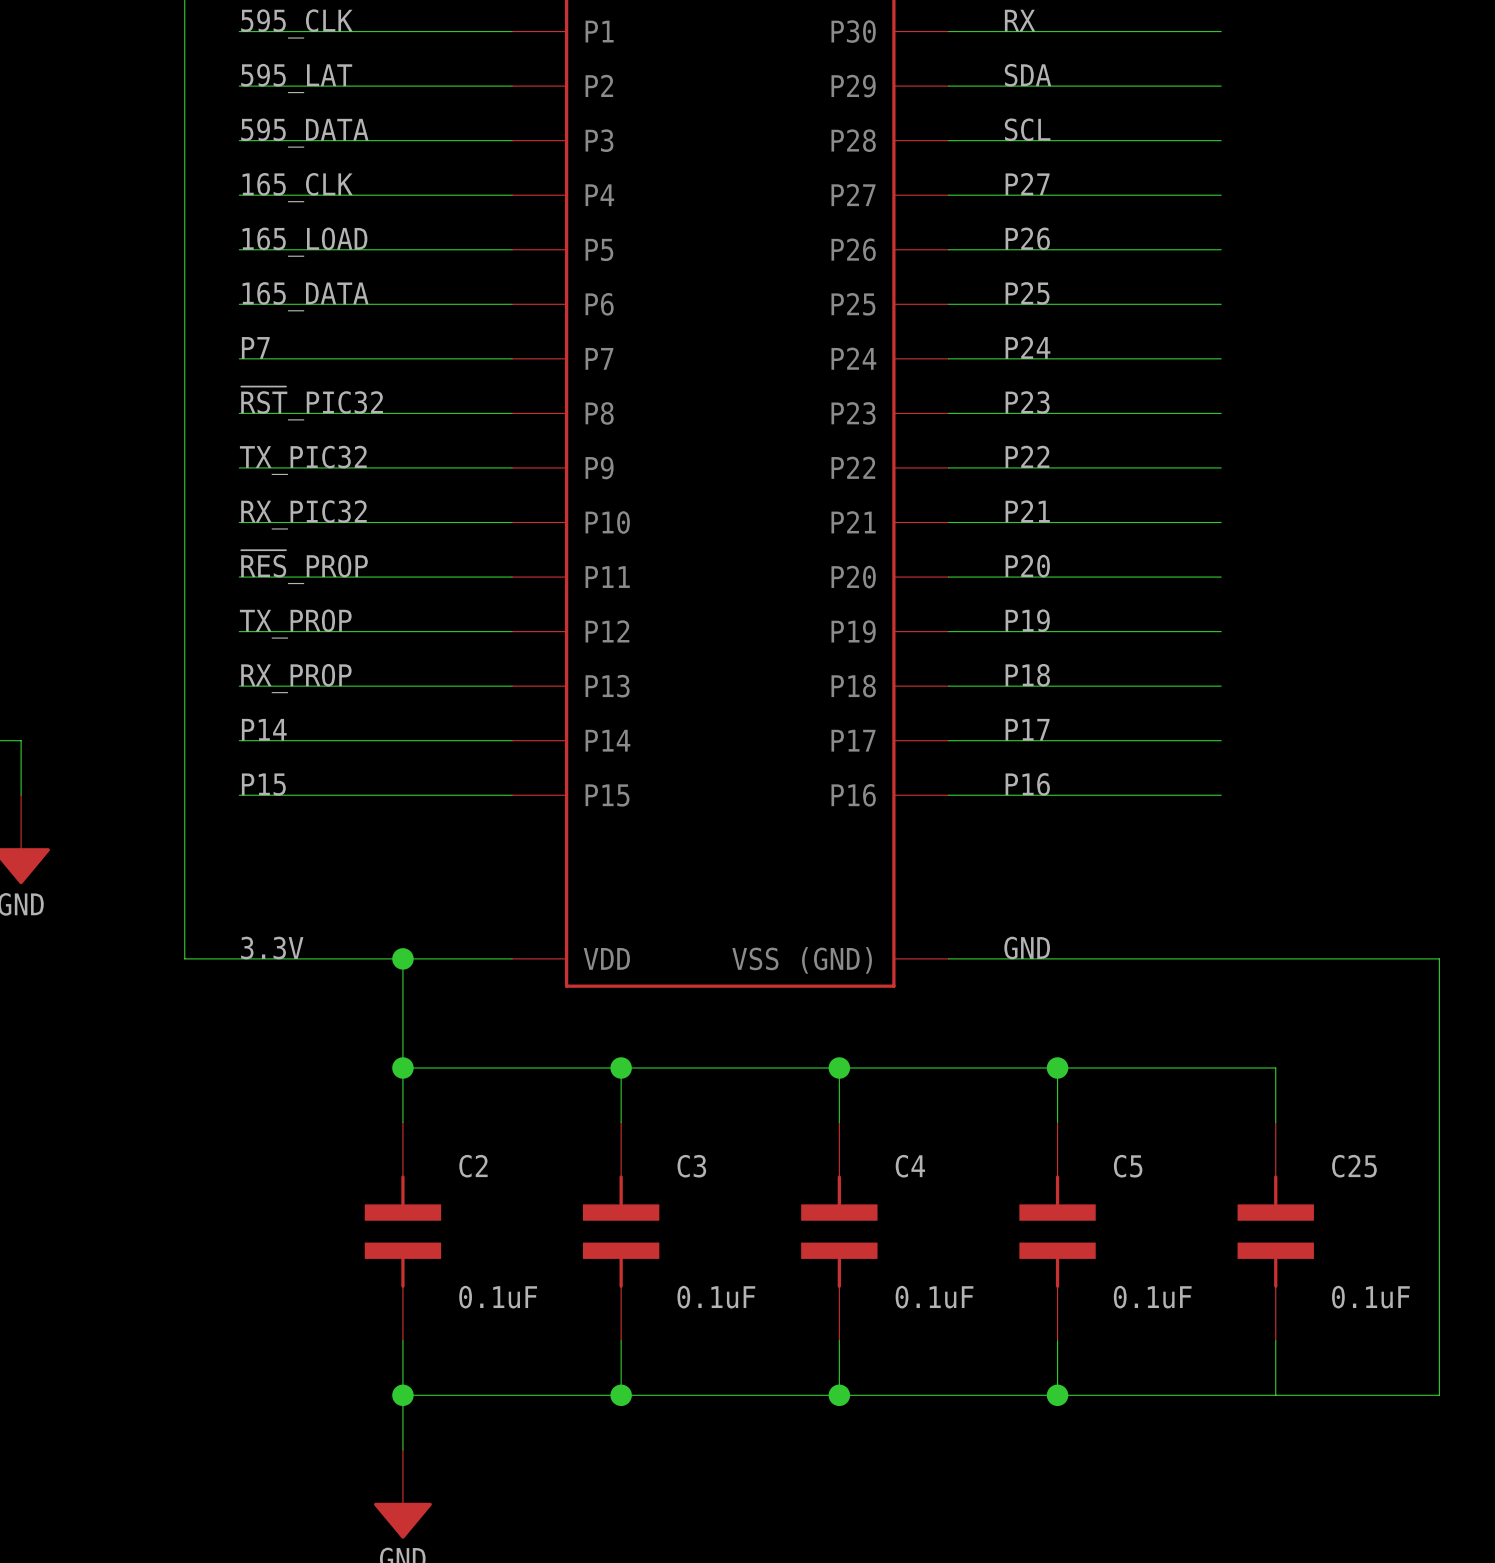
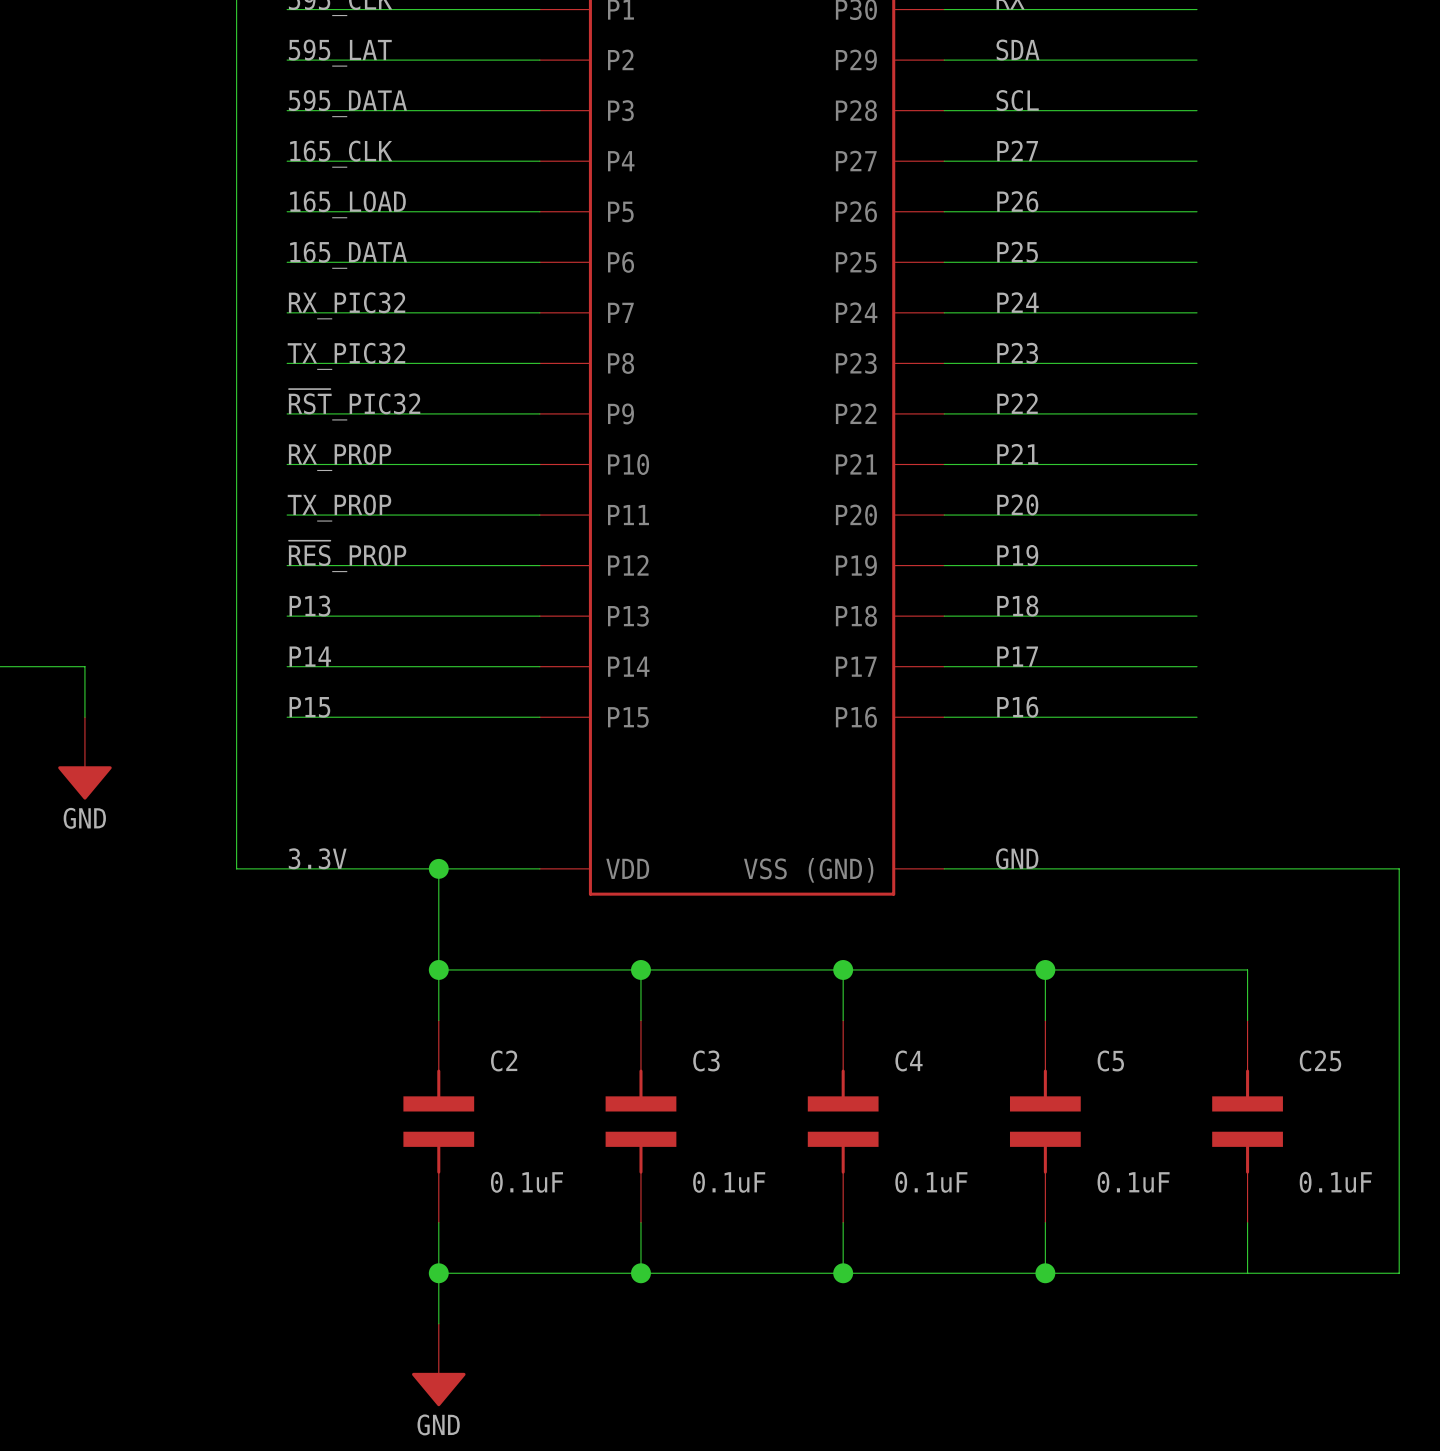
label: P7 (255, 347) -> RX_PIC32 (347, 305)
label: ~{RST}_PIC32 (312, 403) -> TX_PIC32 (346, 356)
label: TX_PIC32 (303, 460) -> ~{RST}_PIC32 (354, 404)
label: RX_PIC32 (303, 514) -> RX_PROP (340, 457)
label: ~{RES}_PROP (304, 567) -> TX_PROP (339, 508)
label: TX_PROP (295, 624) -> ~{RES}_PROP (347, 556)
label: RX_PROP (296, 678) -> P13 (309, 606)

